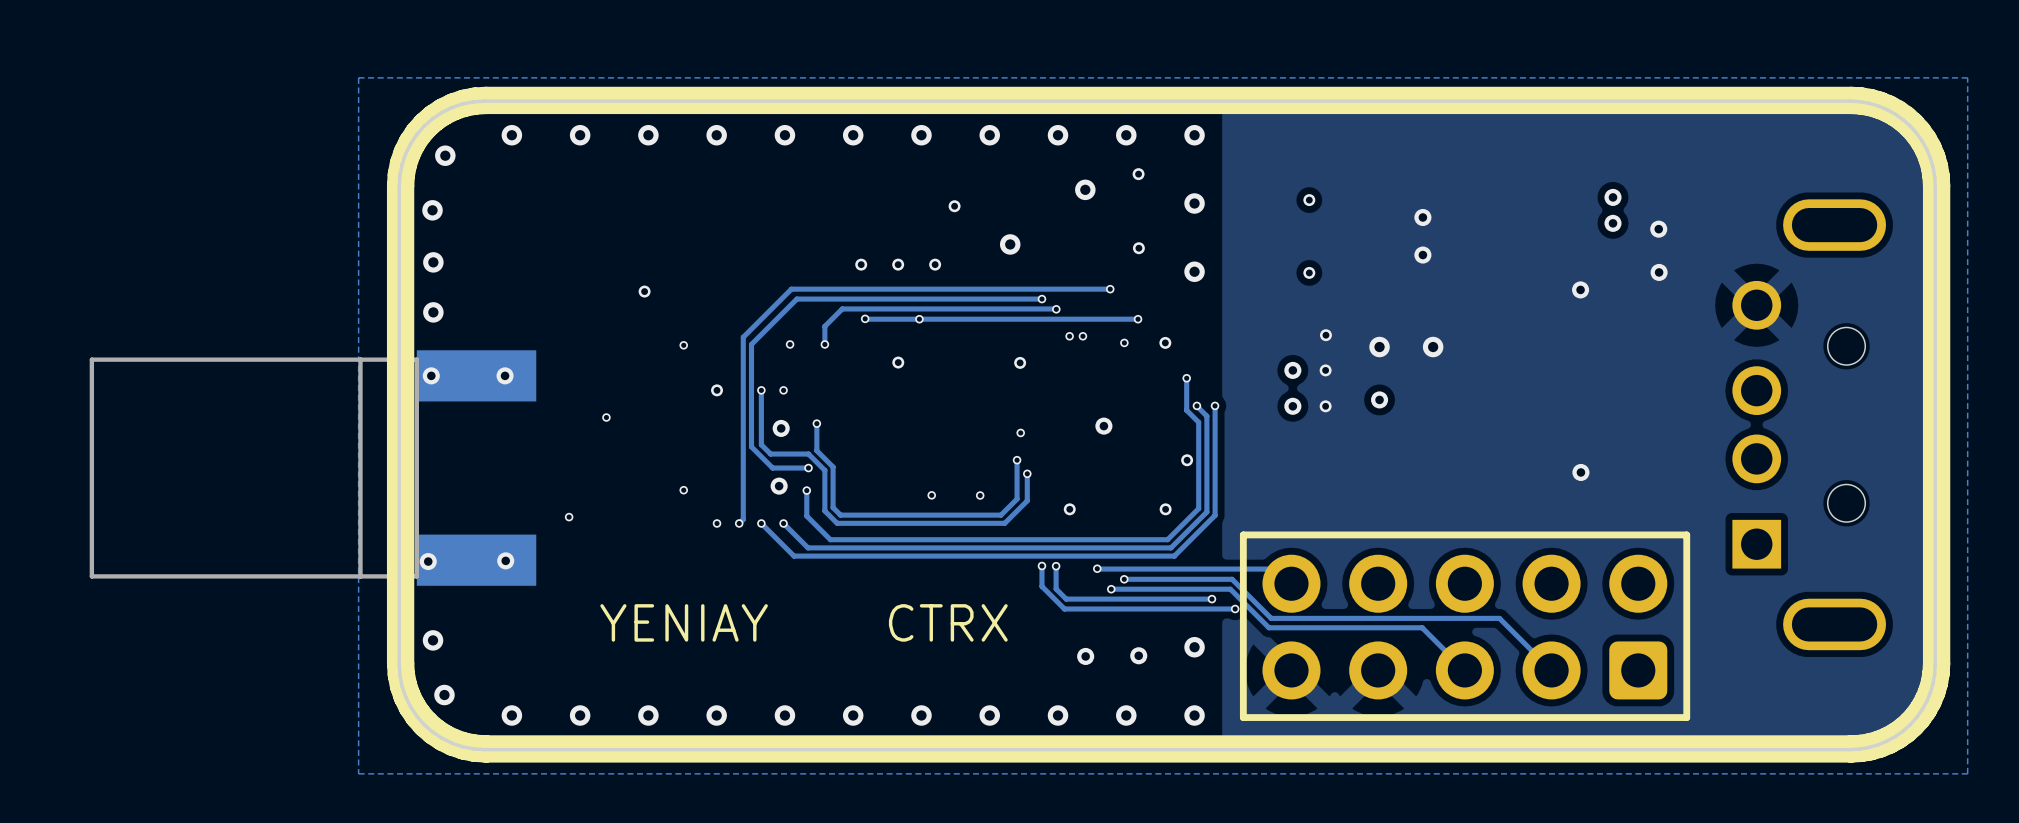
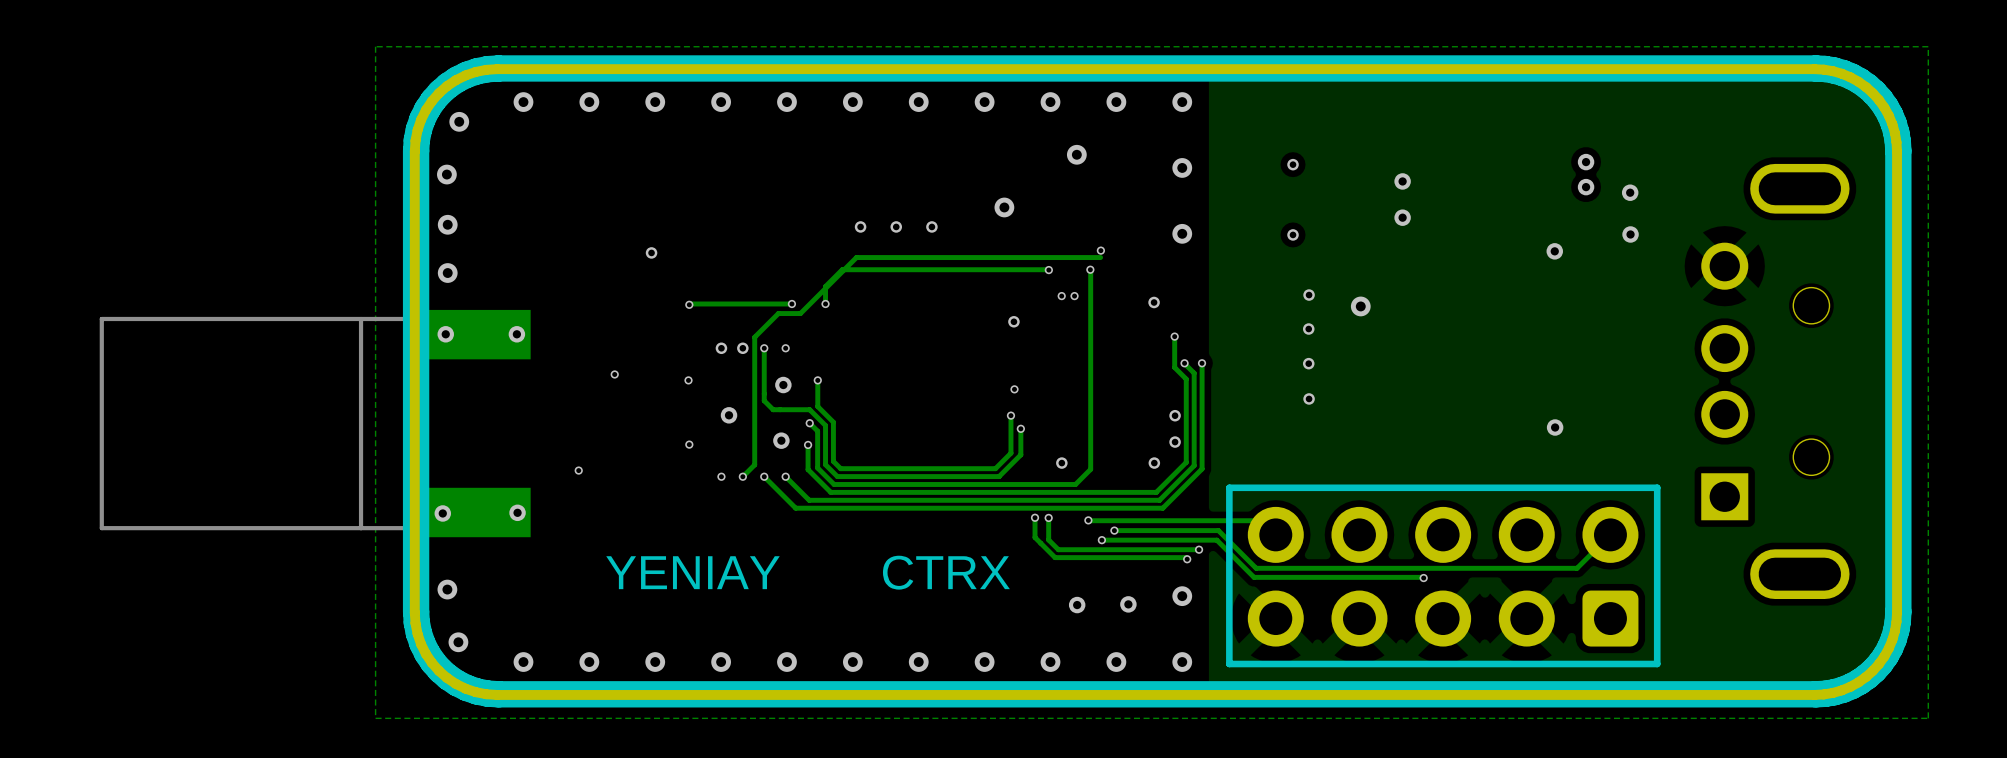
board edge width: thin (1849, 101) (484, 101) (451, 107) (432, 118) (416, 134) (405, 153) (399, 175) (399, 664) (405, 696) (424, 724) (441, 738) (462, 746) (484, 749) (1849, 749) (1878, 744) (1903, 731) (1916, 717) (1926, 701) (1934, 673) (1935, 186) (1933, 167) (1926, 149) (1910, 126) (1895, 114) (1878, 105) (1849, 101) -> thick (1814, 69) (497, 69) (465, 75) (447, 86) (431, 101) (421, 119) (415, 140) (414, 612) (421, 644) (438, 670) (455, 683) (475, 692) (497, 694) (1814, 694) (1841, 690) (1866, 677) (1879, 663) (1888, 648) (1896, 621) (1897, 151) (1894, 133) (1888, 115) (1872, 93) (1858, 81) (1841, 73) (1814, 69)
via: (1138, 174) -> none
via: (954, 206) -> none
via: (1138, 248) -> none
track: (1110, 289) (791, 289) (743, 337) (743, 519) -> none
track: (1041, 299) (796, 299) (751, 344) (751, 378) -> (1100, 257) (856, 257) (800, 313) (778, 313) (754, 337)
via: (1041, 299) -> none
via: none -> (1090, 269)
track: none -> (1090, 270) (1090, 469) (1075, 484) (834, 484) (817, 467) (817, 431) (809, 423)
via: (865, 318) -> none
via: (919, 319) -> none
track: (1138, 319) (865, 319) -> none
via: (1138, 319) -> none
via: (1124, 342) -> none
track: none -> (791, 303) (690, 303)
via: (1433, 347) -> none
via: (898, 362) -> none
via: (1292, 370) -> none
via: none -> (742, 348)
via: (1379, 399) -> none
via: (1292, 406) -> none
via: none -> (688, 380)
via: (1103, 426) -> none
via: none -> (1309, 398)
track: (751, 446) (772, 468) (808, 468) -> (754, 402) (754, 464) (746, 472)
via: none -> (729, 415)
part position: (312, 468) -> (315, 423)
via: none -> (1175, 442)
via: (931, 495) -> none
via: (980, 495) -> none
track: (1062, 607) (1064, 609) (1235, 609) -> (1055, 557) (1185, 557) (1187, 559)
via position: (1235, 609) -> (1187, 559)
track: (1499, 618) (1551, 670) -> (1476, 568) (1577, 568) (1610, 534)
track: (1422, 627) (1464, 670) -> (1401, 577) (1423, 577)
via: none -> (1423, 578)

